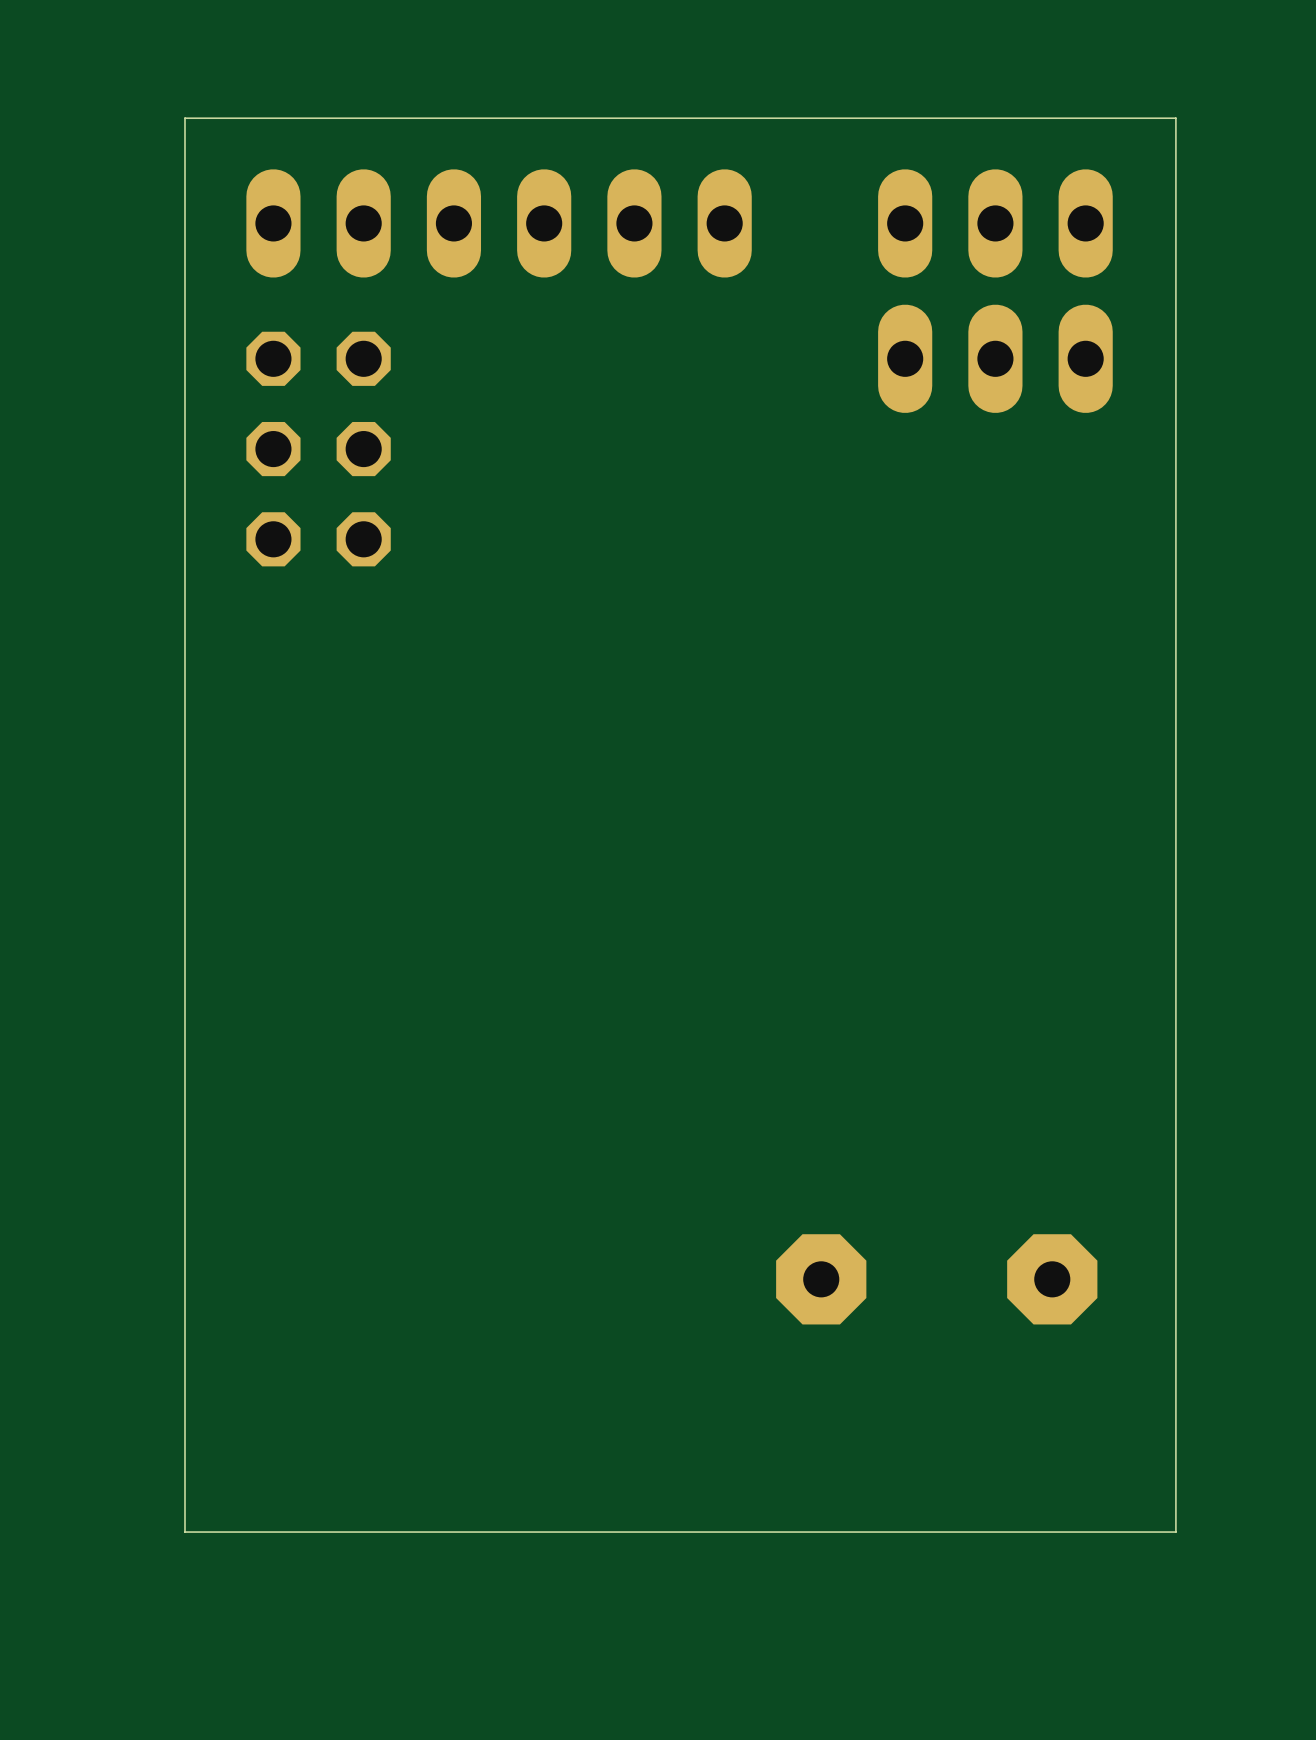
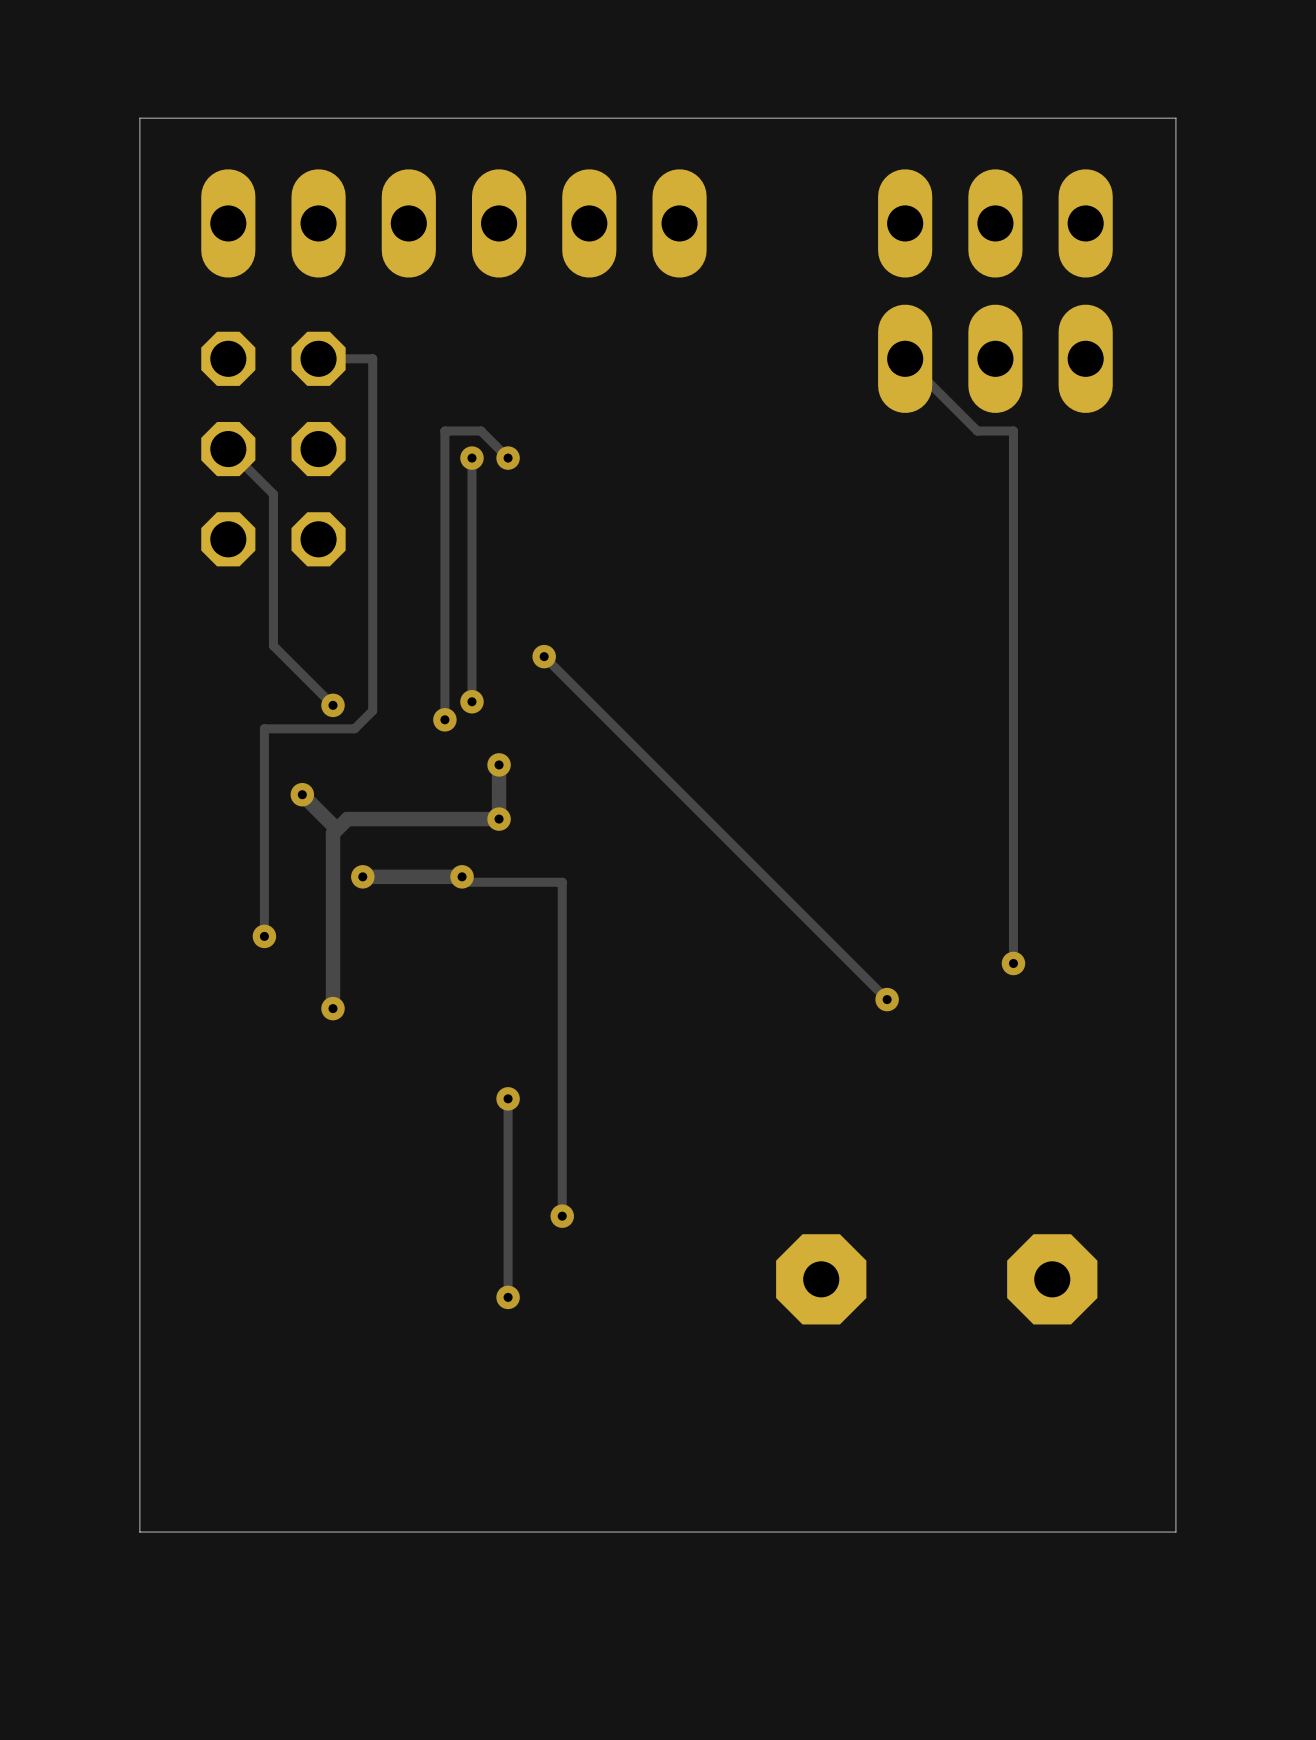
board edge: (184, 118) (184, 1532) -> (184, 118) (139, 118) (139, 1532) (184, 1532)
part position: (499, 223) -> (453, 223)
track: none -> (318, 358) (372, 358) (372, 710) (354, 728) (264, 728) (264, 936)
track: none -> (905, 358) (977, 431) (1013, 431) (1013, 963)
track: none -> (228, 449) (273, 494) (273, 645) (333, 705)
part position: (318, 449) -> (273, 449)
track: none -> (471, 458) (471, 701)
via: none -> (471, 458)
track: none -> (508, 458) (481, 431) (444, 431) (444, 719)
via: none -> (508, 458)
track: none -> (544, 656) (887, 999)
via: none -> (544, 656)
via: none -> (471, 701)
via: none -> (333, 705)
via: none -> (444, 719)
track: none -> (499, 764) (499, 819) (347, 819) (333, 833)
via: none -> (499, 764)
track: none -> (302, 794) (333, 825) (333, 833)
via: none -> (302, 794)
via: none -> (499, 819)
track: none -> (333, 833) (333, 1008)
track: none -> (362, 876) (462, 876) (462, 882) (562, 882) (562, 1216)
via: none -> (362, 876)
via: none -> (462, 876)
via: none -> (264, 936)
via: none -> (1013, 963)
via: none -> (887, 999)
via: none -> (333, 1008)
track: none -> (508, 1098) (508, 1297)
via: none -> (508, 1098)
via: none -> (562, 1216)
via: none -> (508, 1297)

